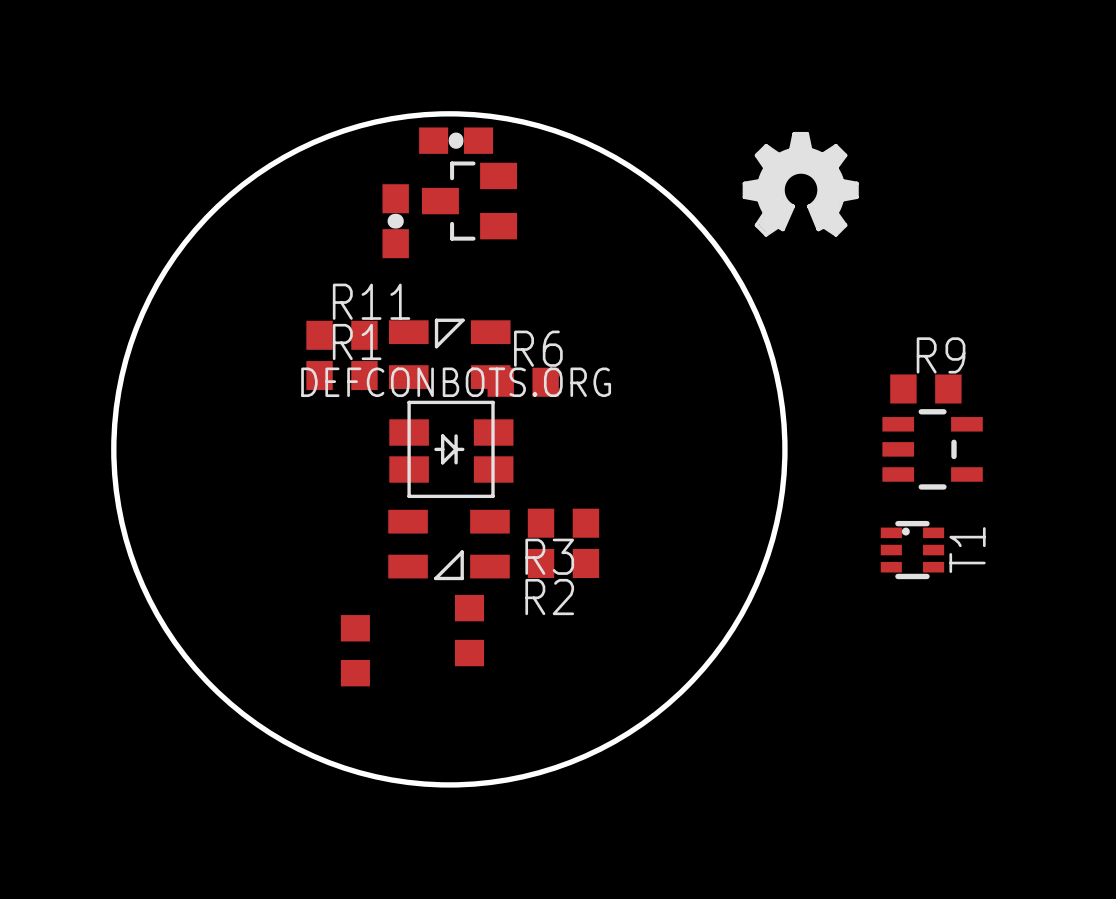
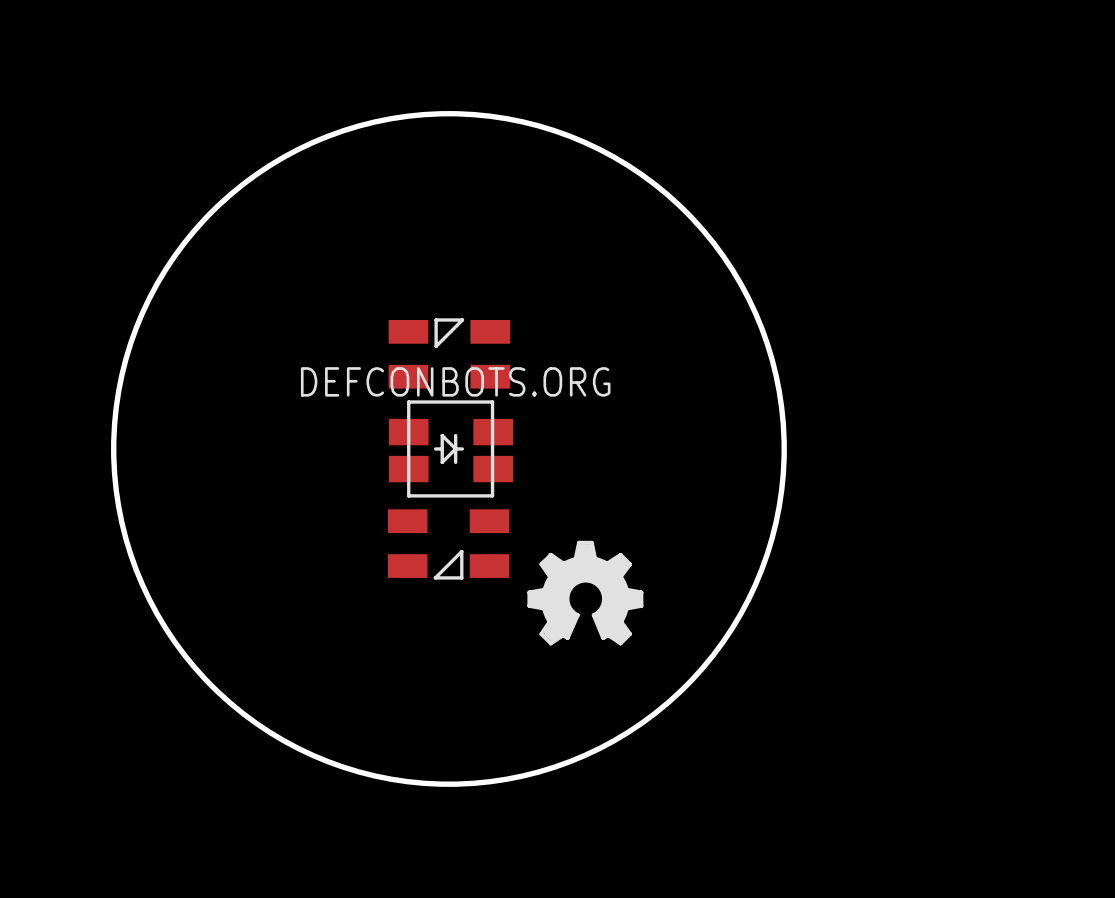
part: (456, 140) -> none
drawing position: (800, 184) -> (585, 593)
part: (469, 201) -> none
part: (395, 221) -> none
R11: (342, 335) -> none
R1: (342, 375) -> none
R6: (523, 382) -> none
R9: (925, 388) -> none
part: (932, 449) -> none
R3: (563, 523) -> none
T1: (912, 550) -> none
R2: (563, 563) -> none
part: (469, 630) -> none
part: (355, 650) -> none

